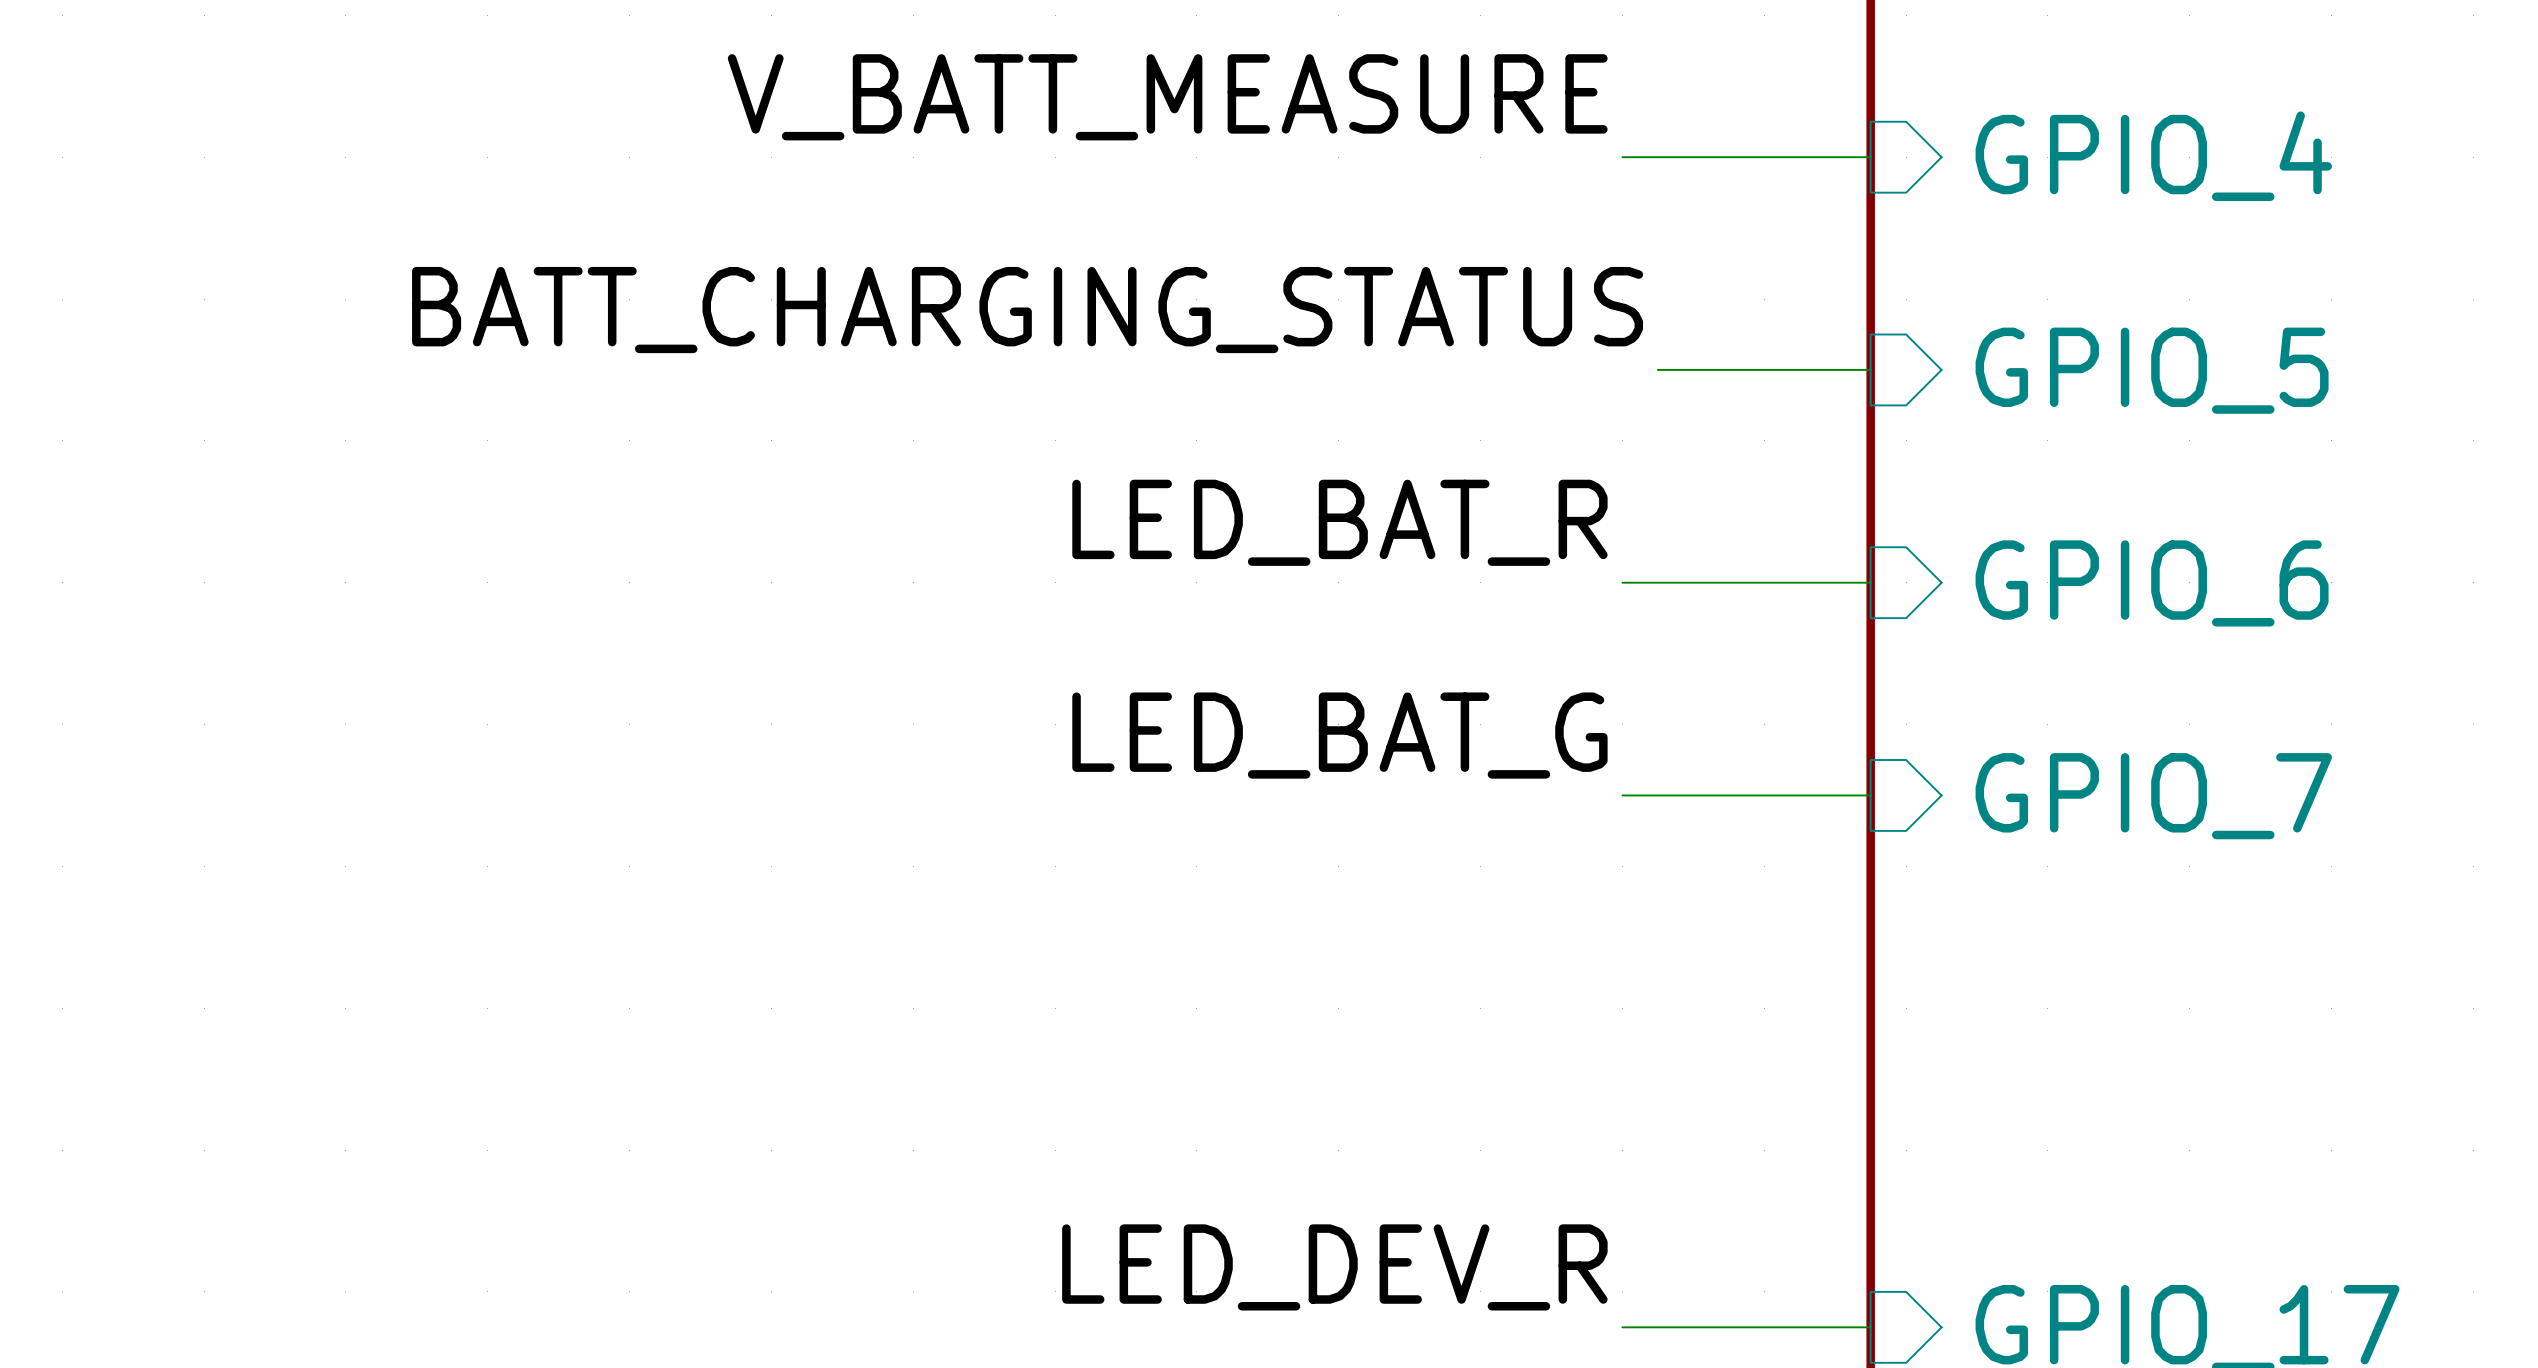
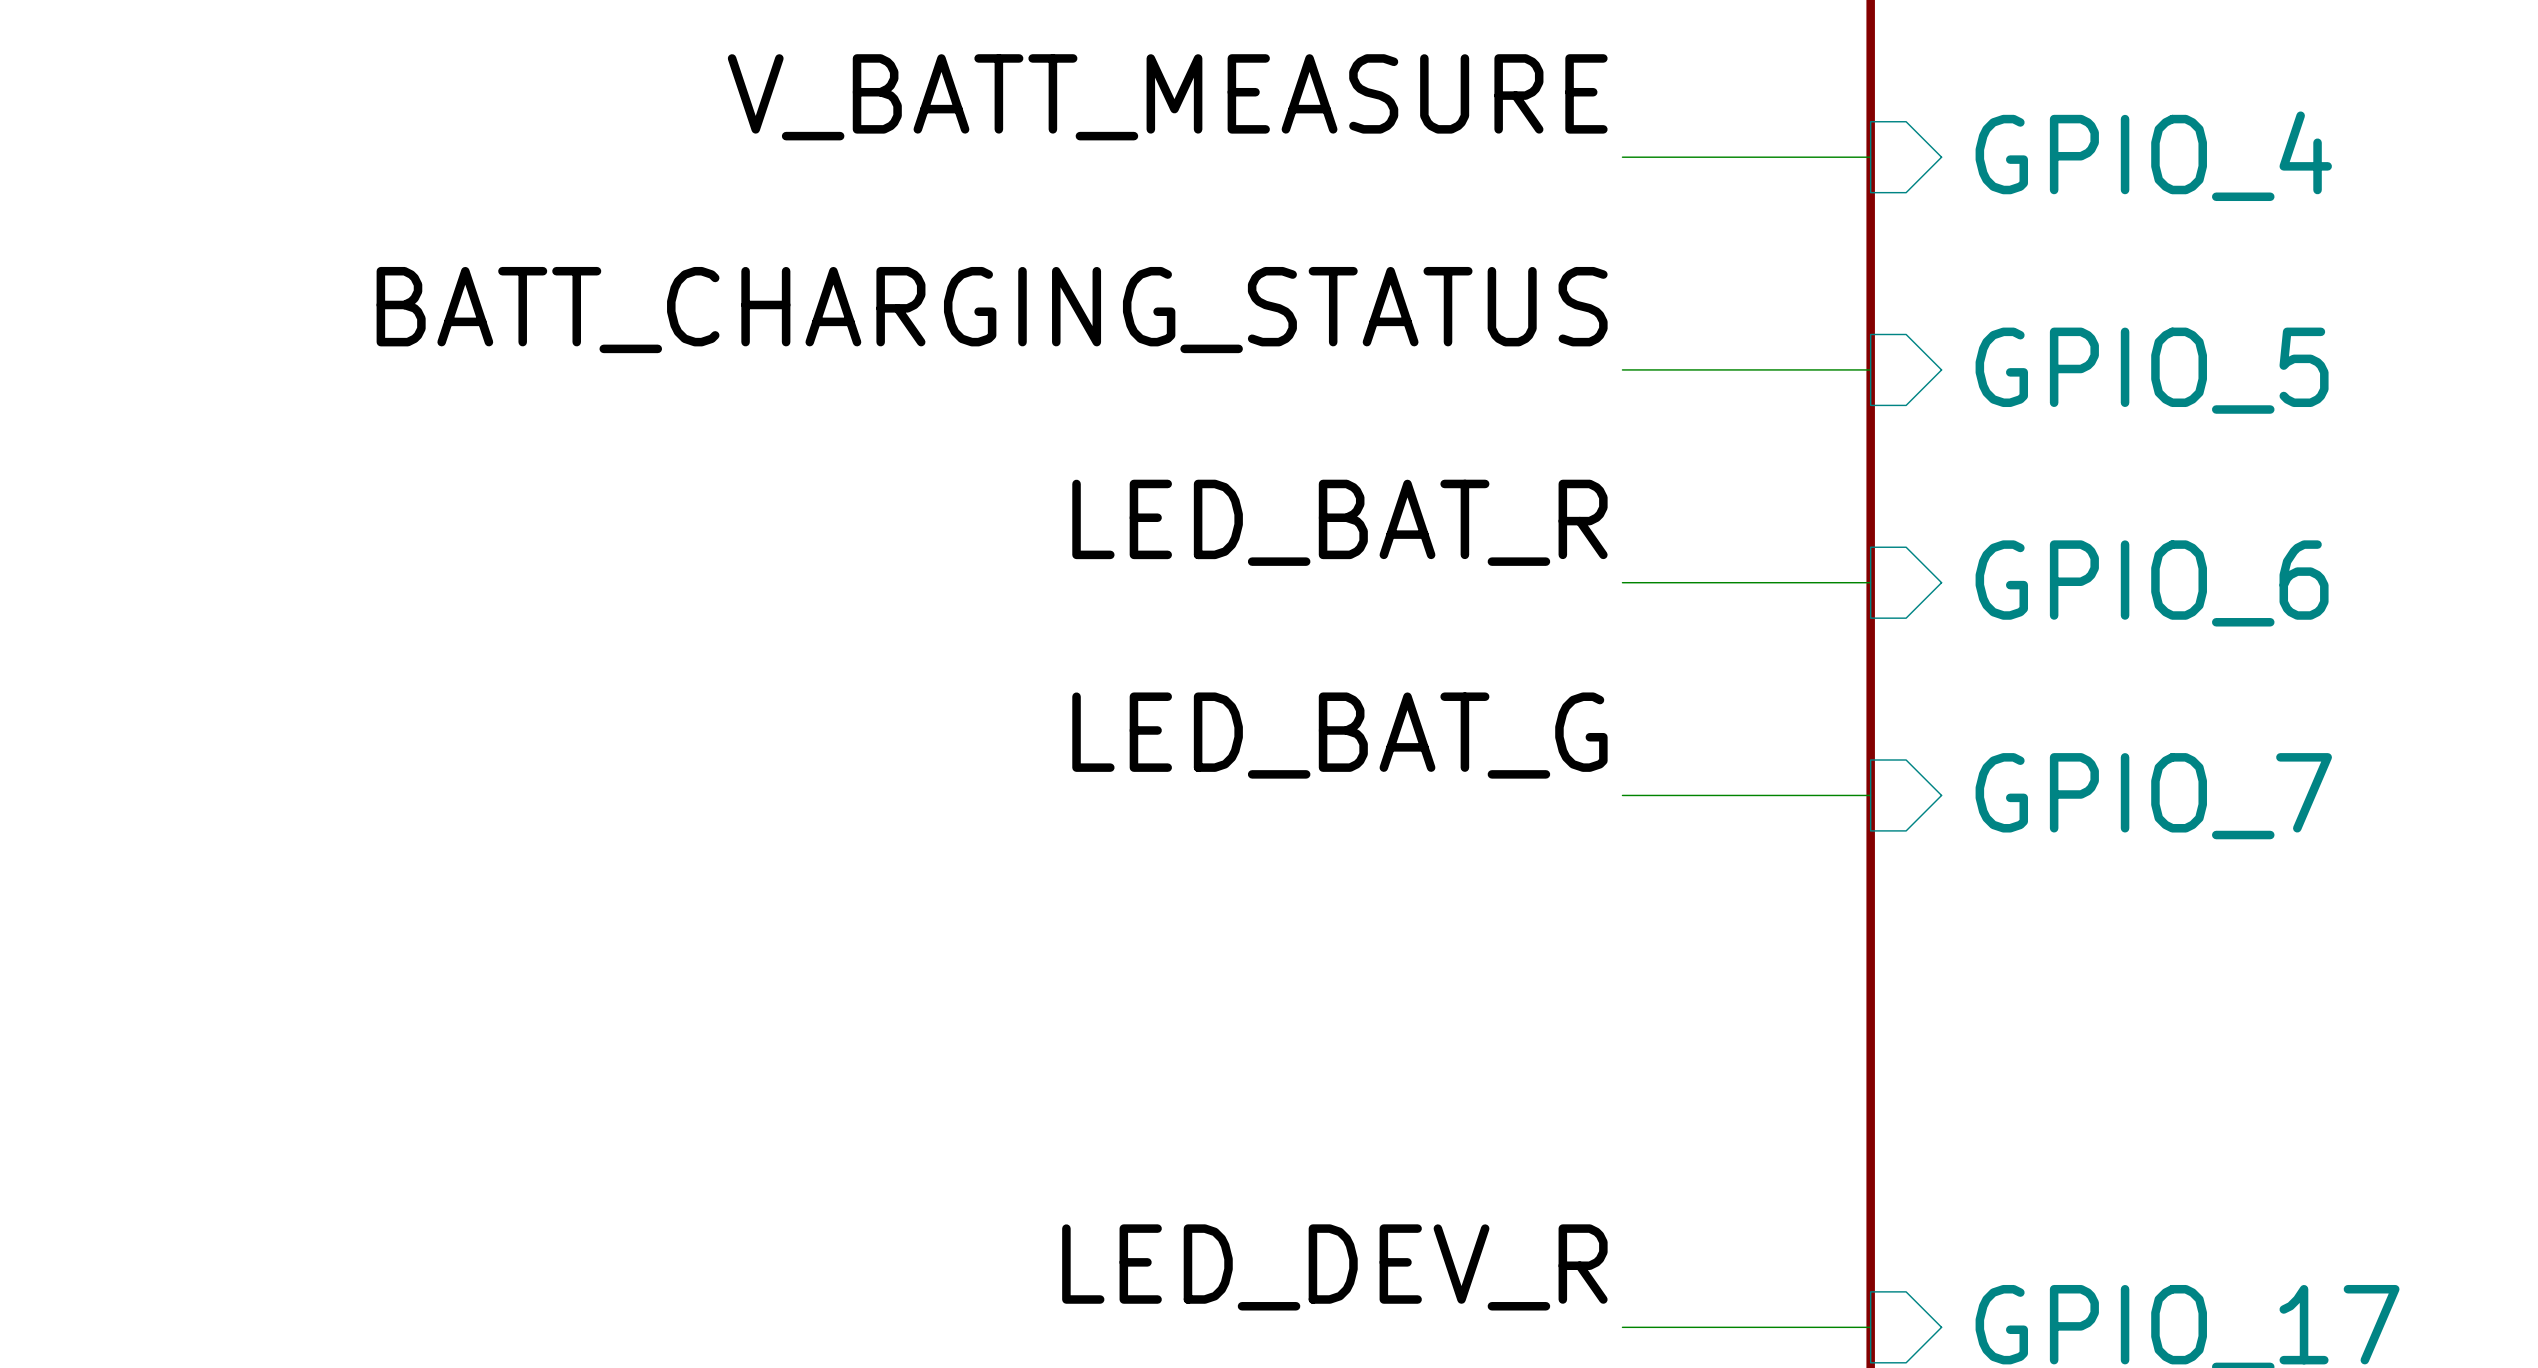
label position: BATT_CHARGING_STATUS (1027, 310) -> BATT_CHARGING_STATUS (992, 310)
wire: none -> (1622, 369) (1657, 369)

